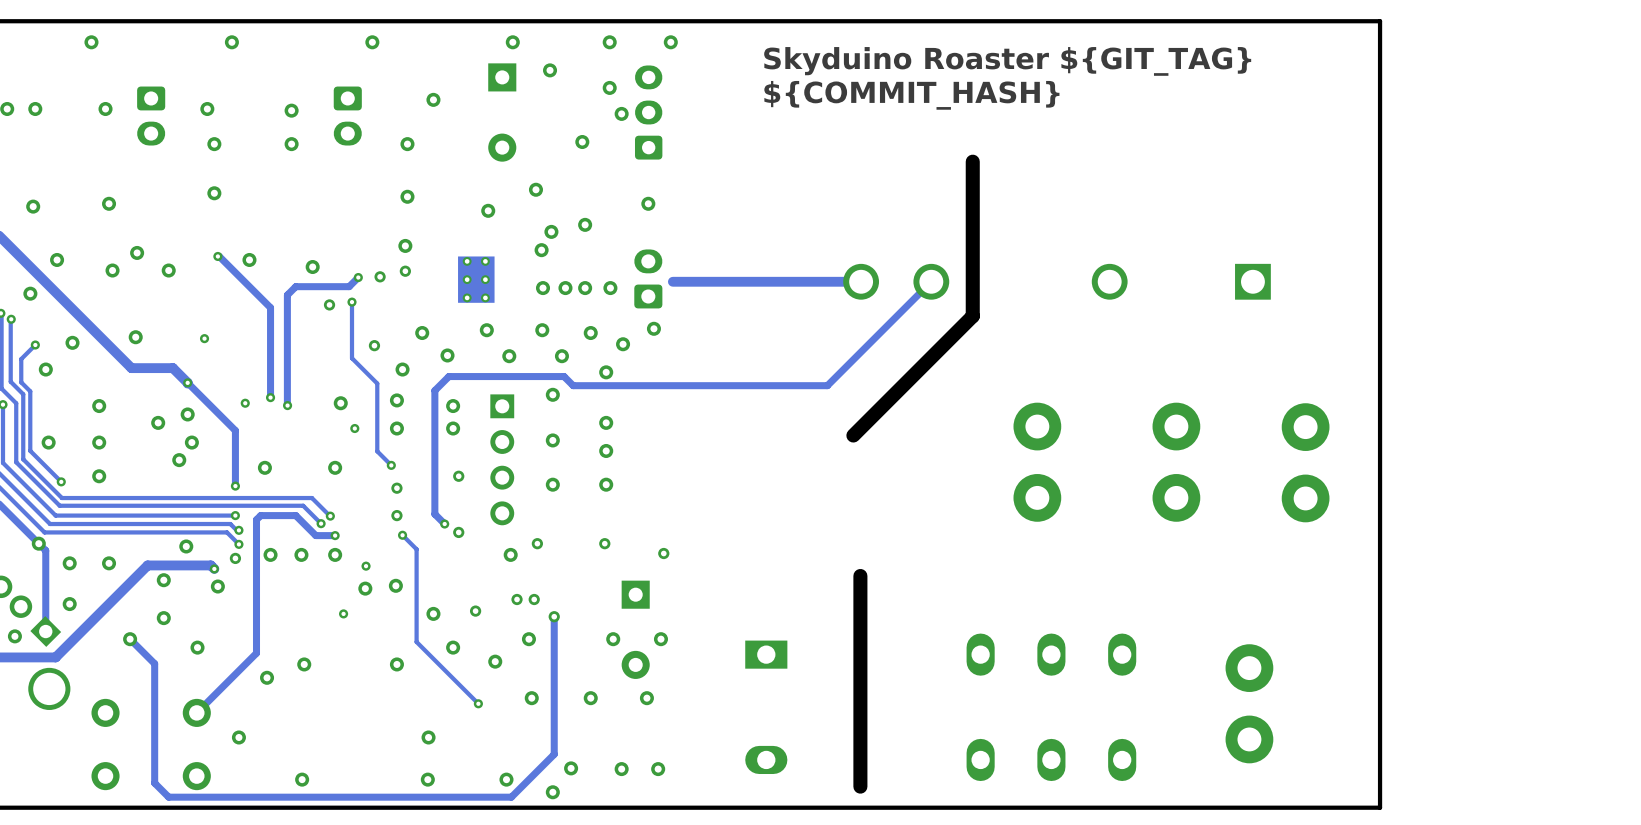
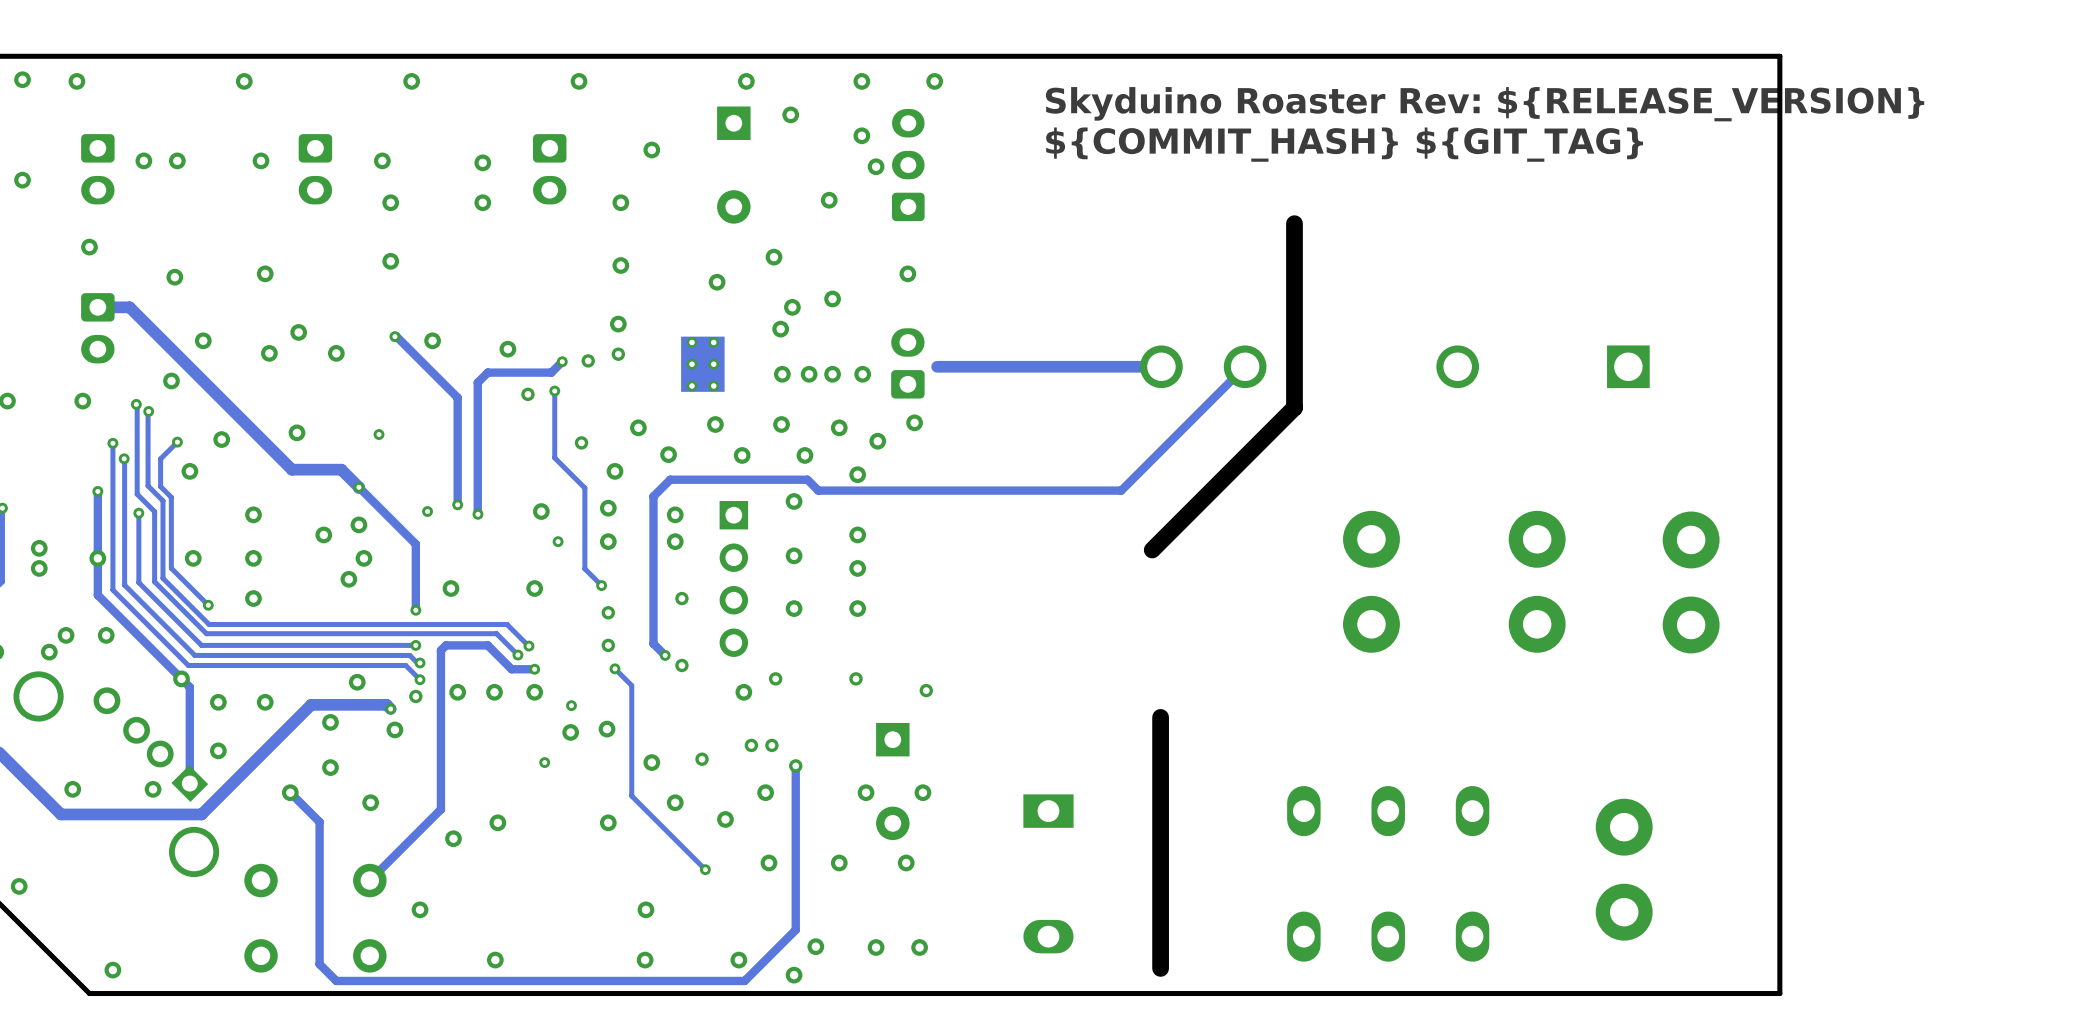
text: Skyduino Roaster ${GIT_TAG} (1007, 61) -> Skyduino Roaster Rev: ${RELEASE_VERSION} (1485, 104)
text: ${COMMIT_HASH} (911, 95) -> ${COMMIT_HASH} ${GIT_TAG} (1344, 144)

